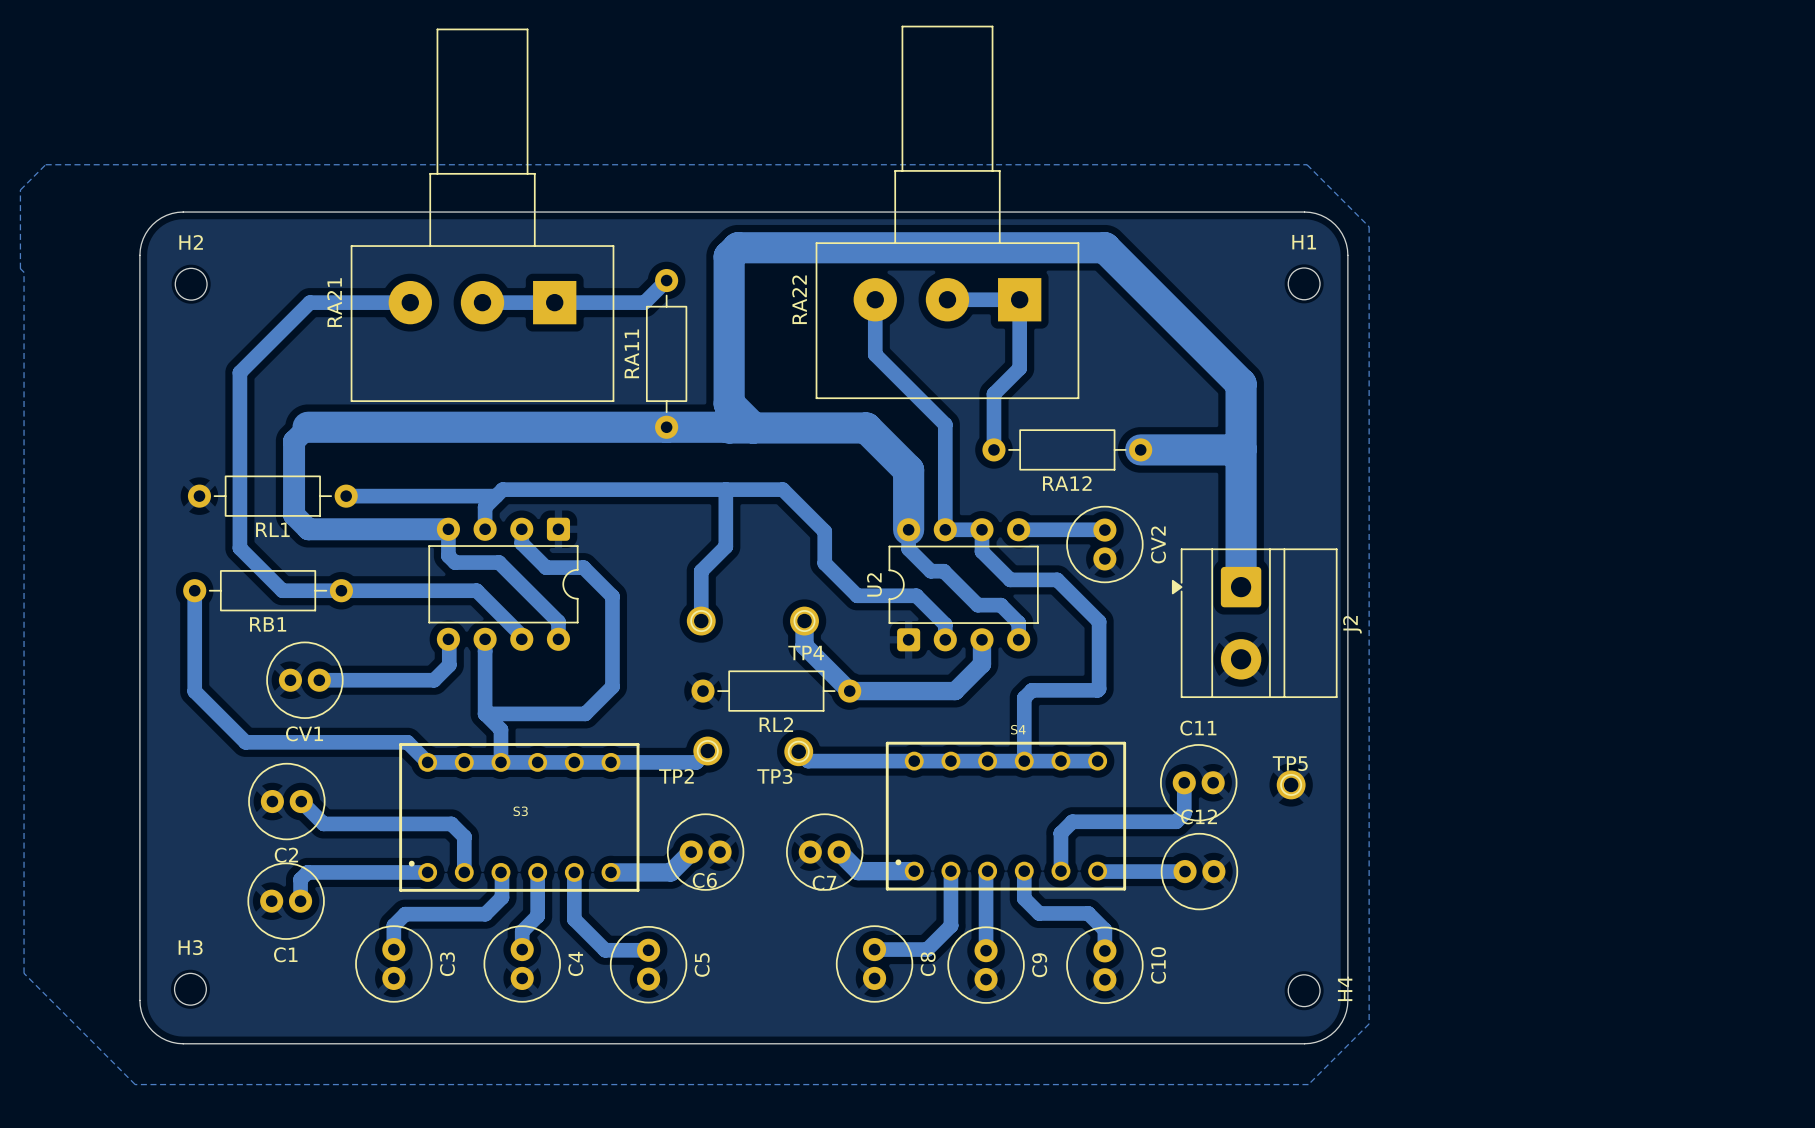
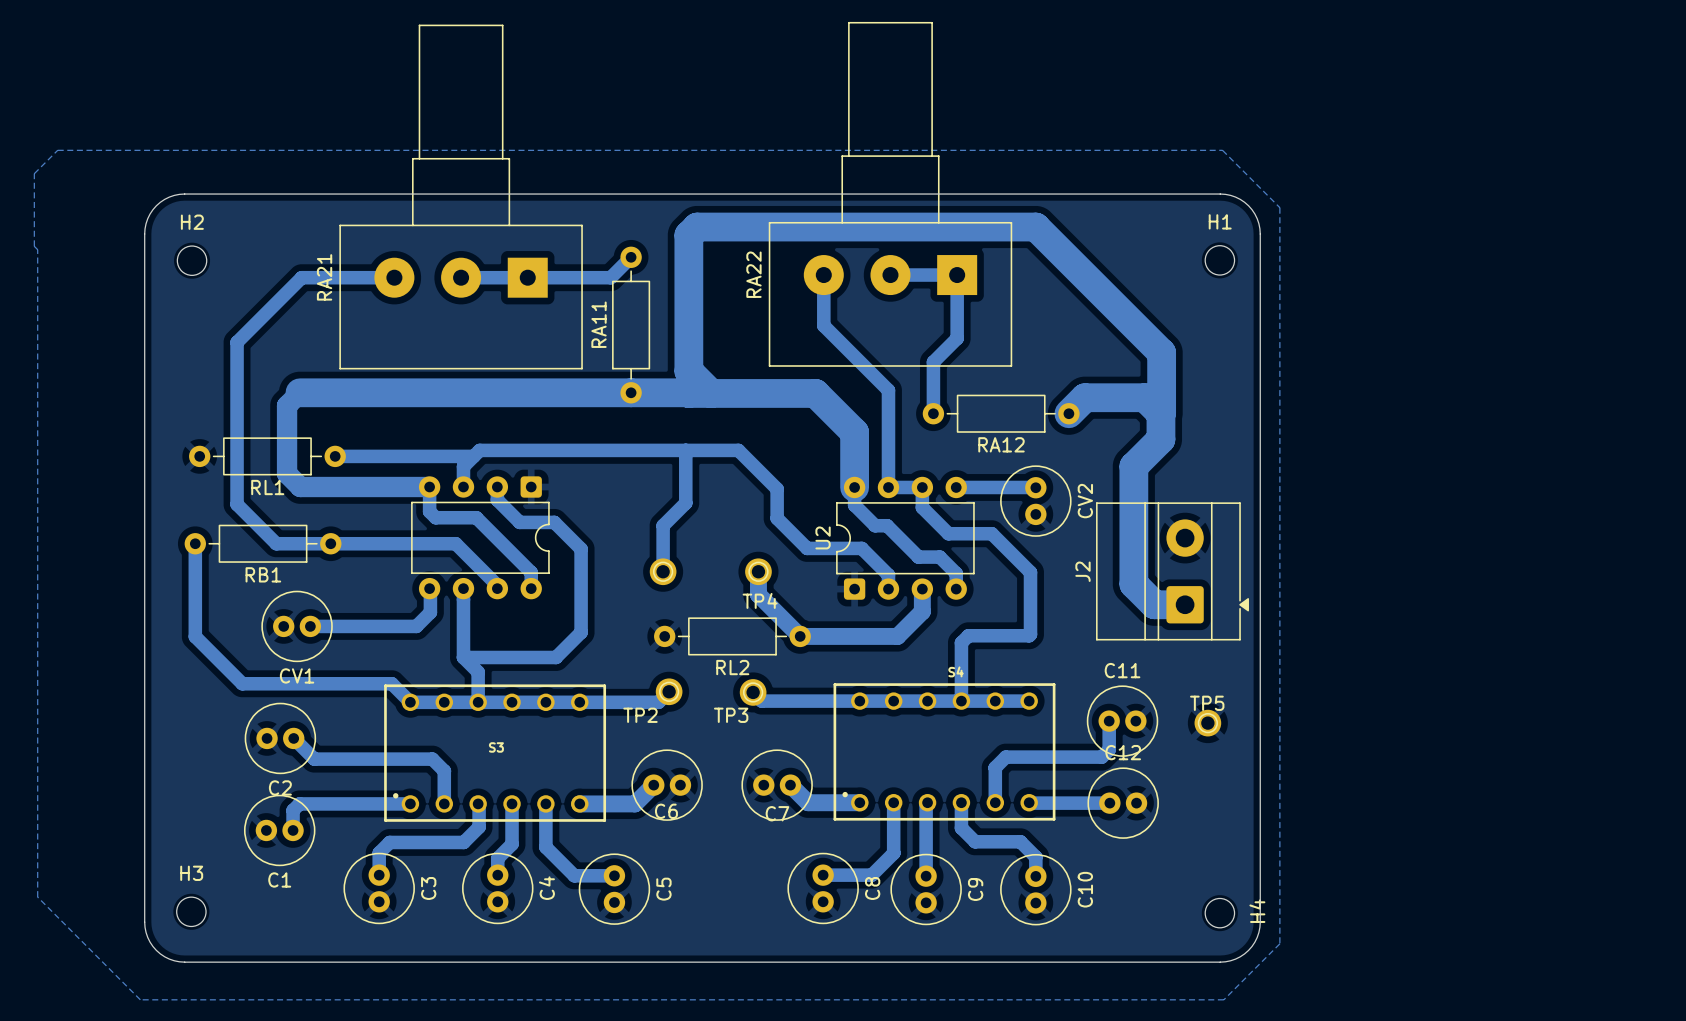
bottom track: (1140, 449) (1240, 449) -> (1068, 413) (1084, 397) (1144, 397) (1160, 413) (1160, 439) (1133, 466) (1133, 584) (1154, 604) (1185, 604)
bottom track: (1241, 449) (1241, 587) -> none
J2 rotation: 0° (1254, 623) -> 180° (1172, 571)

